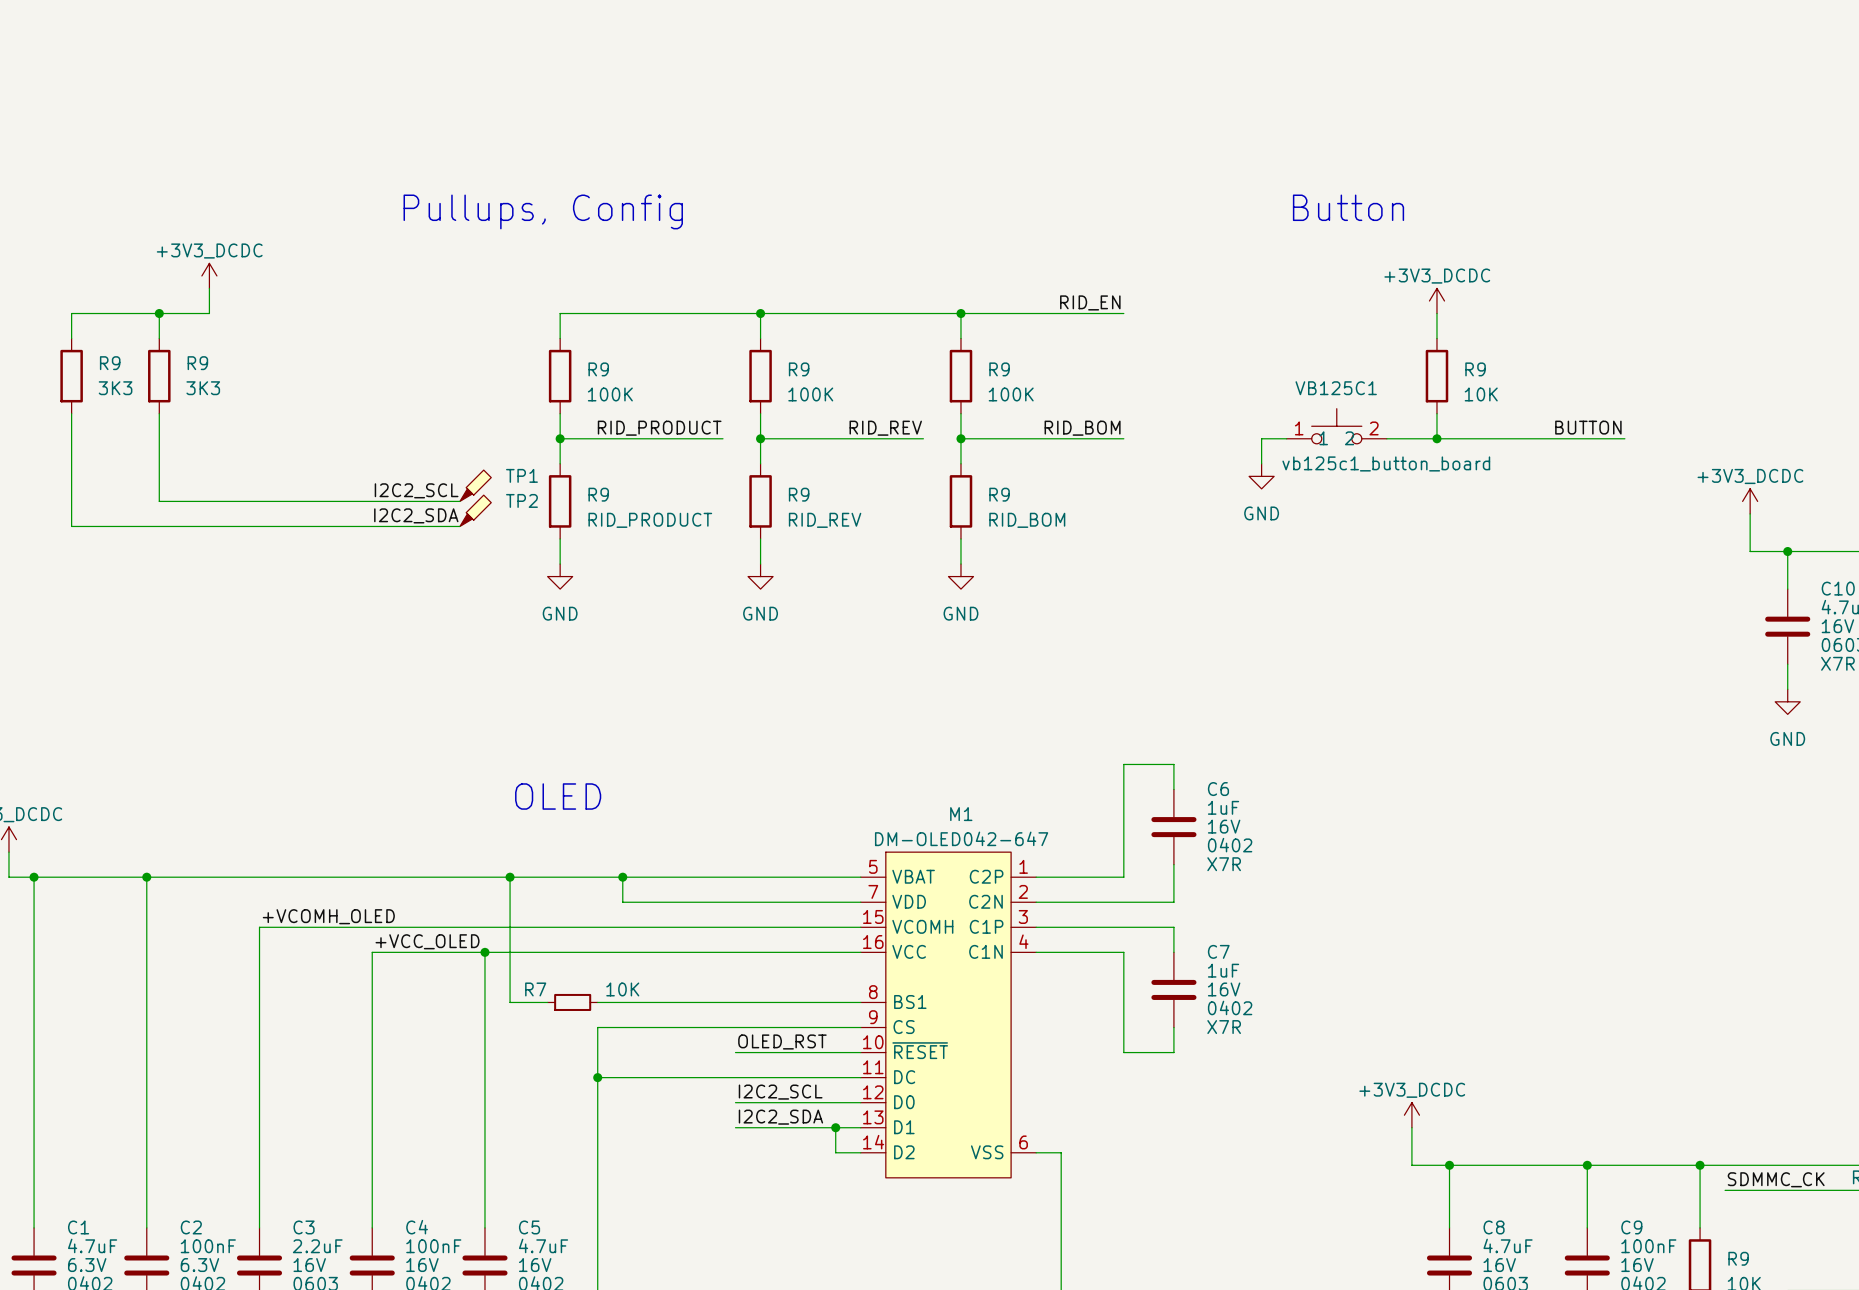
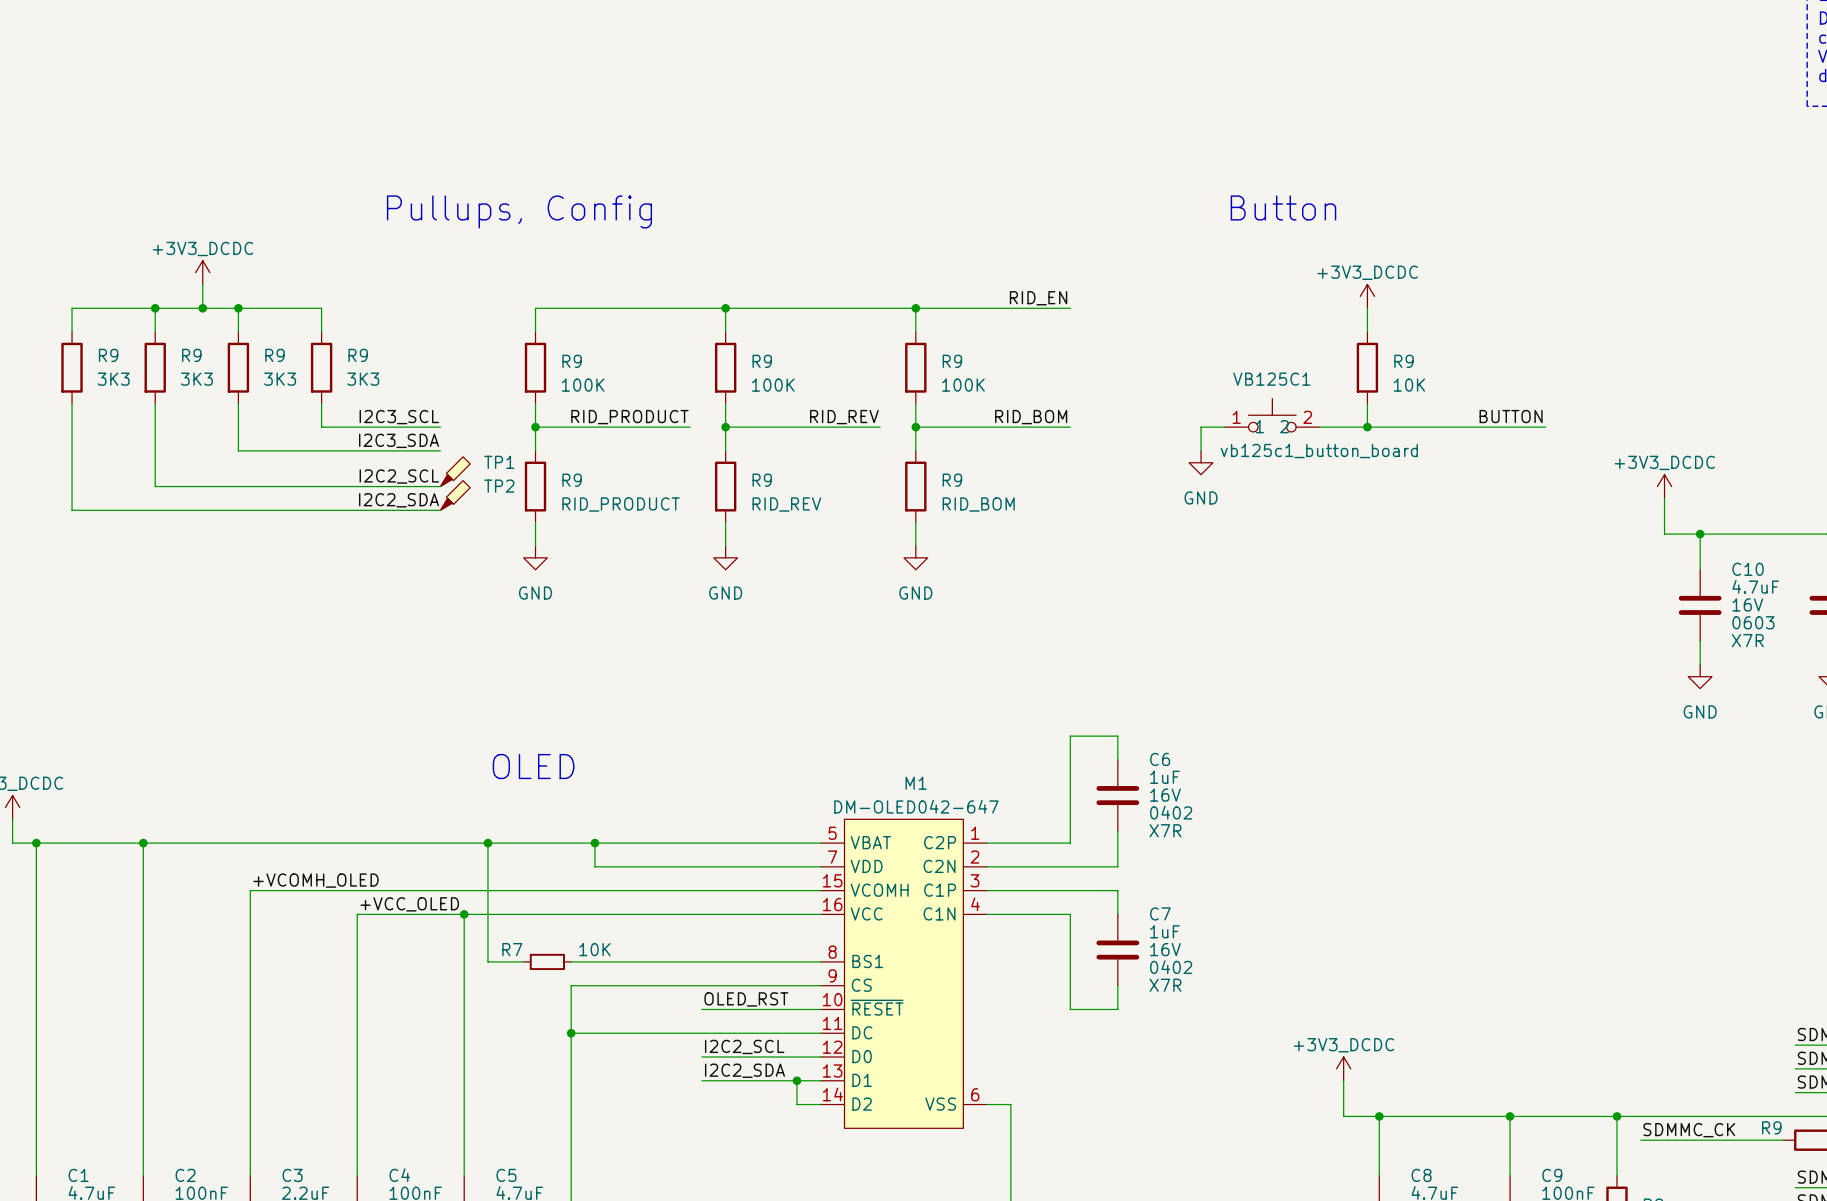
wire: none -> (202, 308) (321, 308) (321, 332)
junction: none -> (202, 308)
wire: none -> (238, 308) (238, 332)
junction: none -> (238, 308)
R9: none -> 3K3 (238, 367)
R9: none -> 3K3 (321, 367)
wire: none -> (238, 403) (238, 450) (440, 450)
wire: none -> (321, 403) (321, 427) (440, 427)
label: none -> I2C3_SCL (399, 417)
label: none -> I2C3_SDA (399, 440)

